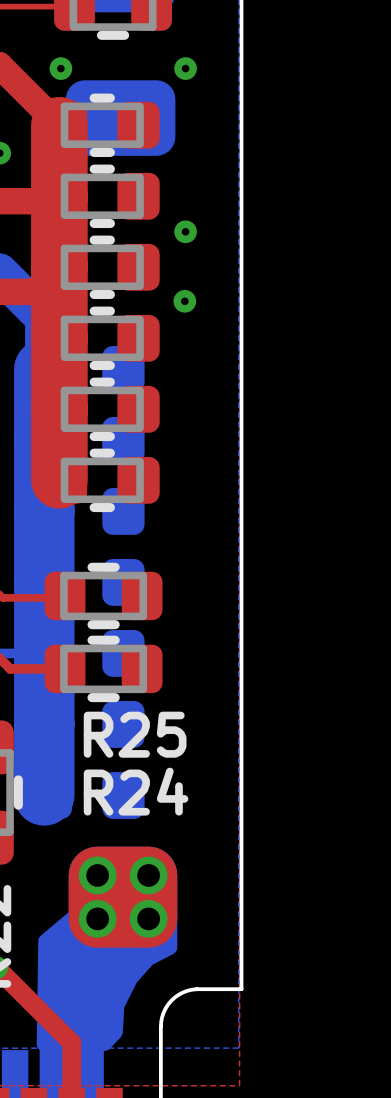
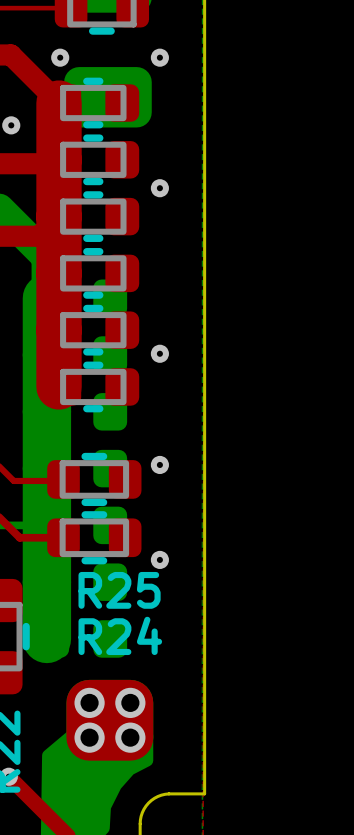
via: (184, 301) -> none
via: none -> (159, 353)
via: none -> (159, 464)
via: none -> (159, 559)

